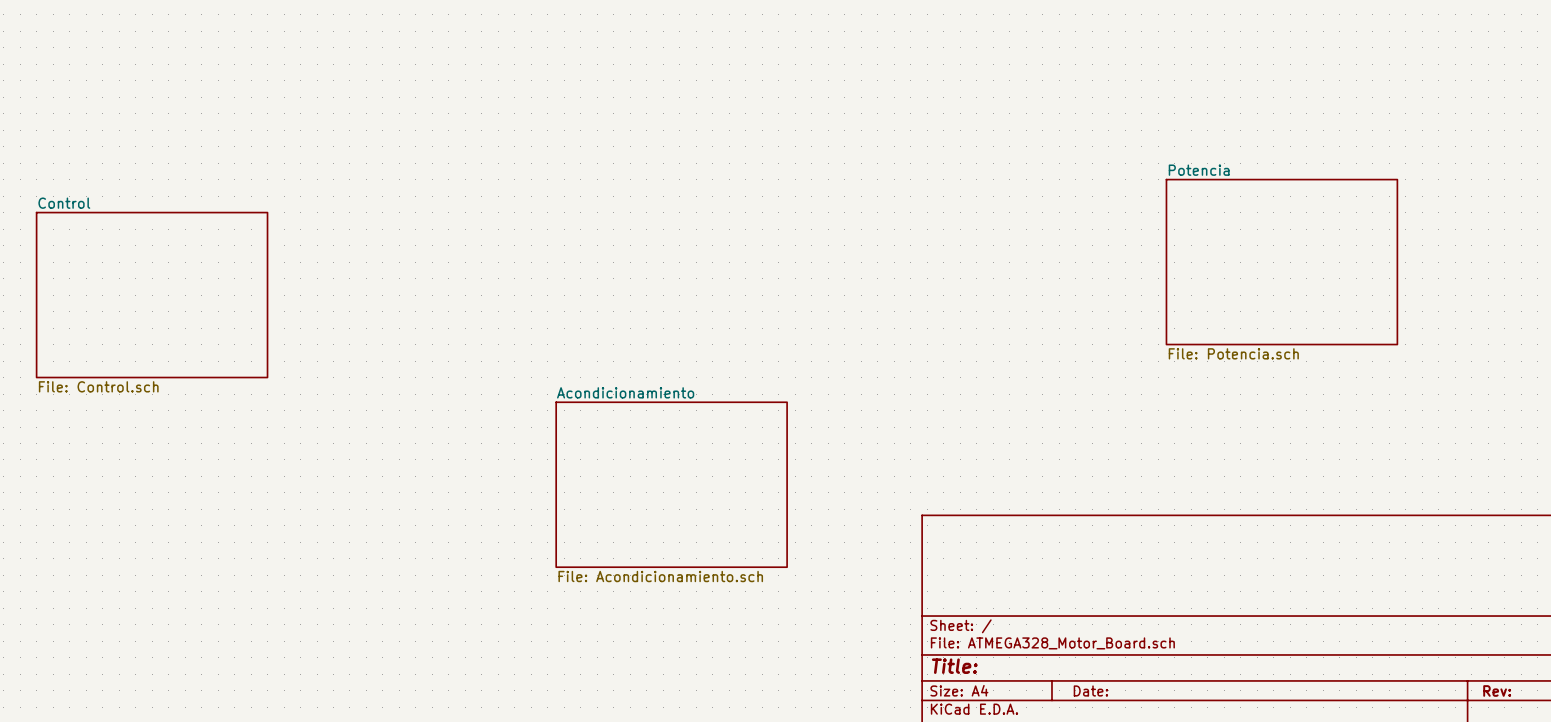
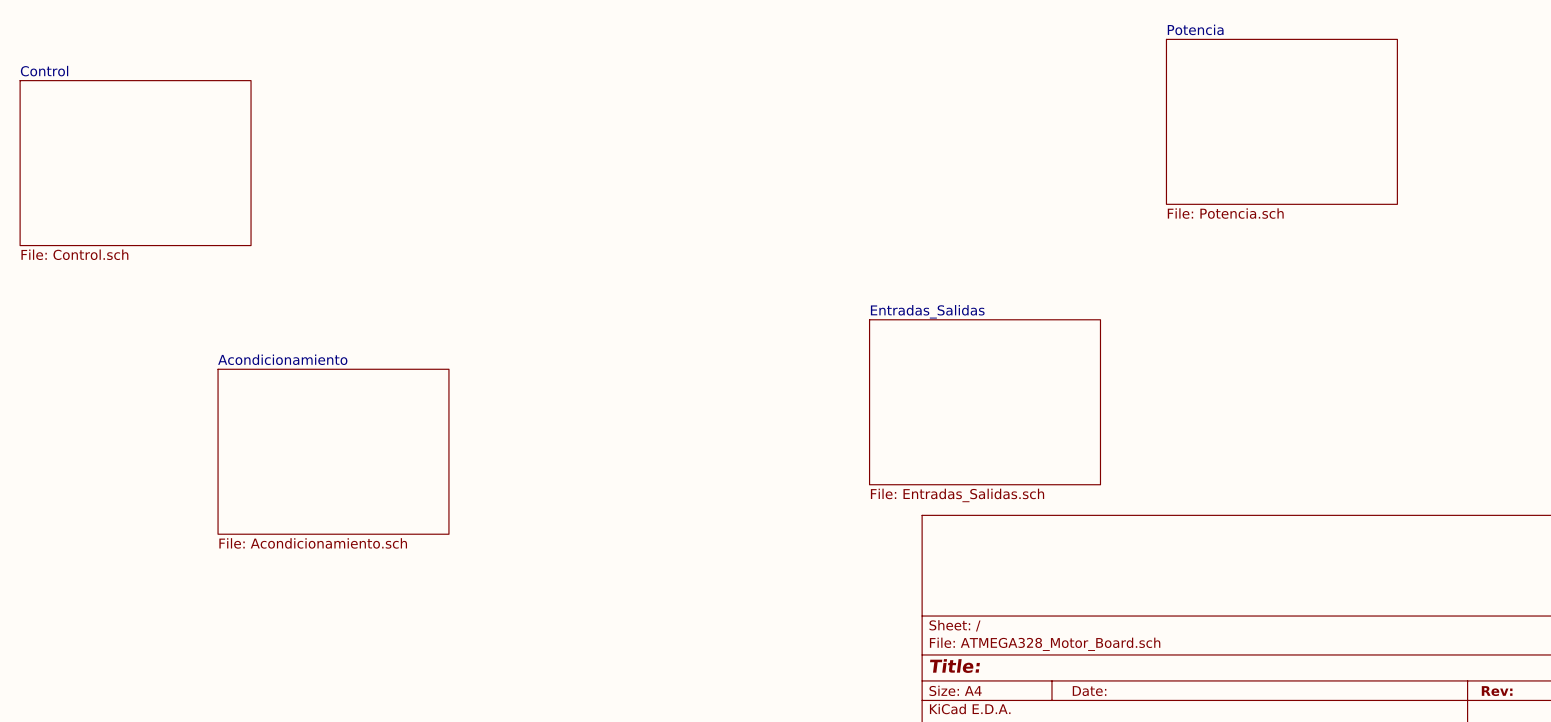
sheet Potencia position: (1281, 262) -> (1281, 121)
sheet Control position: (152, 295) -> (135, 163)
sheet Entradas_Salidas: none -> File: Entradas_Salidas.sch (985, 402)
sheet Acondicionamiento: none -> File: Acondicionamiento.sch (333, 451)
sheet Acondicionamiento: File: Acondicionamiento.sch (671, 484) -> none

